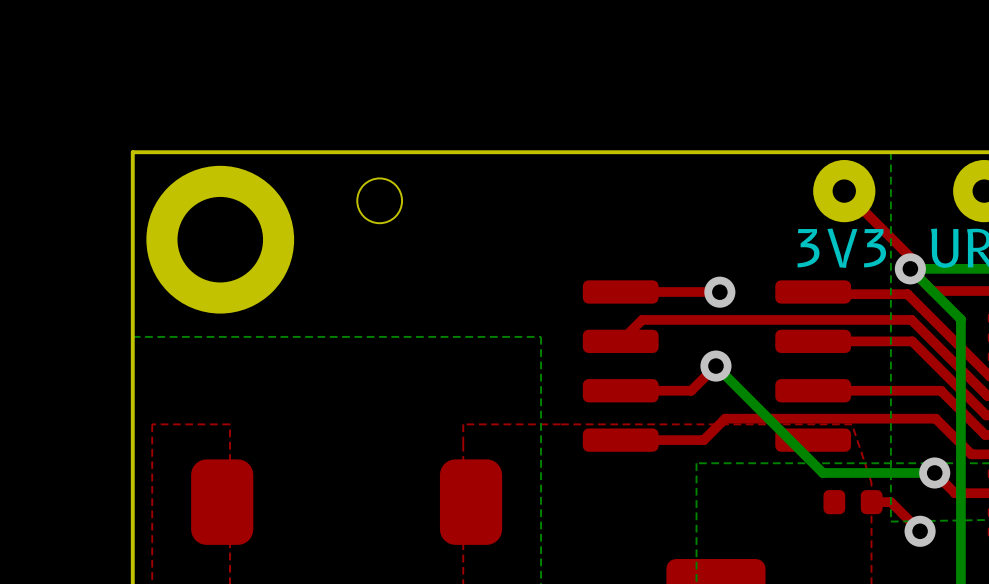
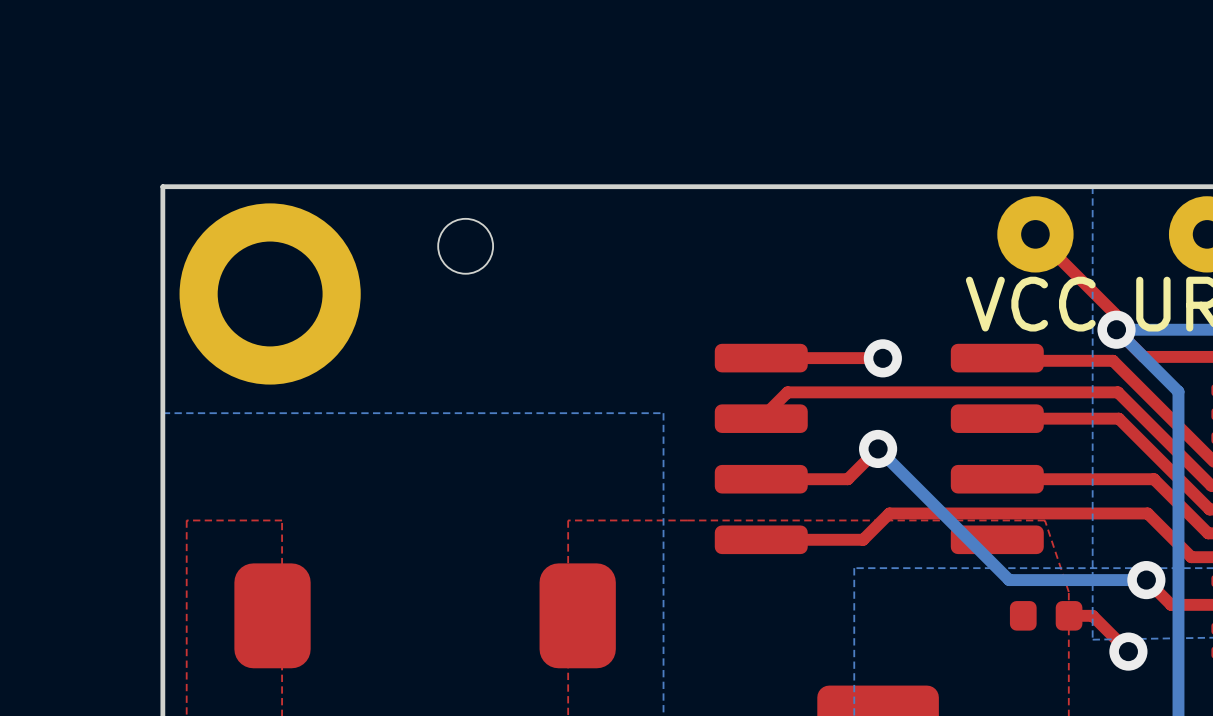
text: 3V3 (841, 248) -> VCC (1030, 304)

